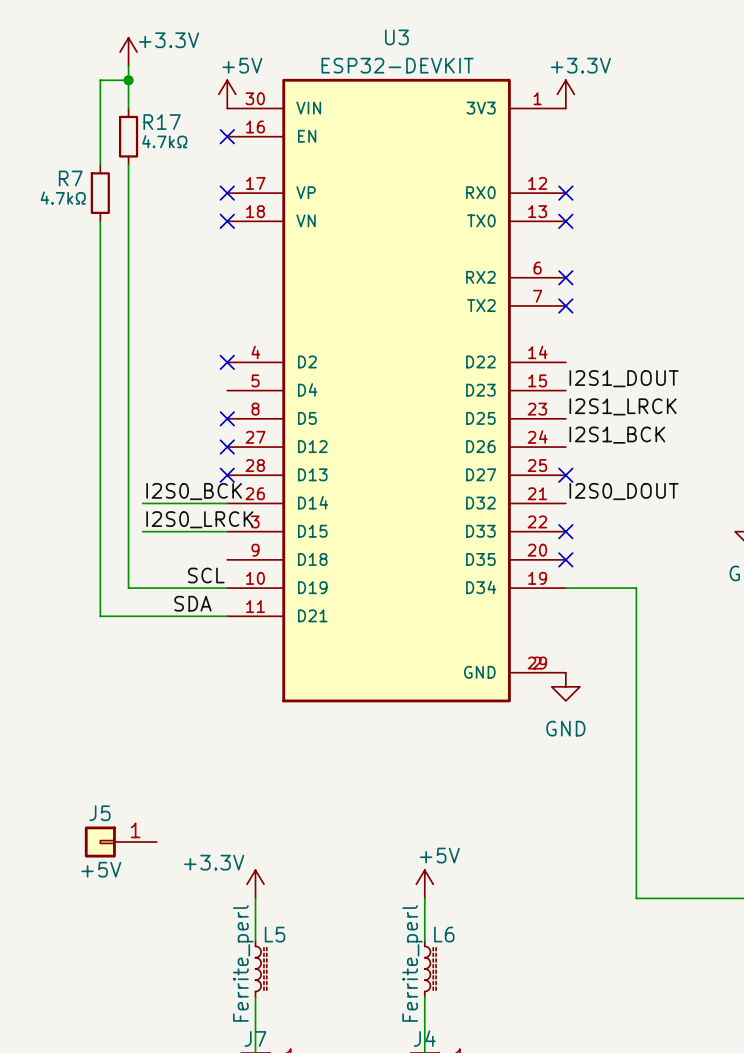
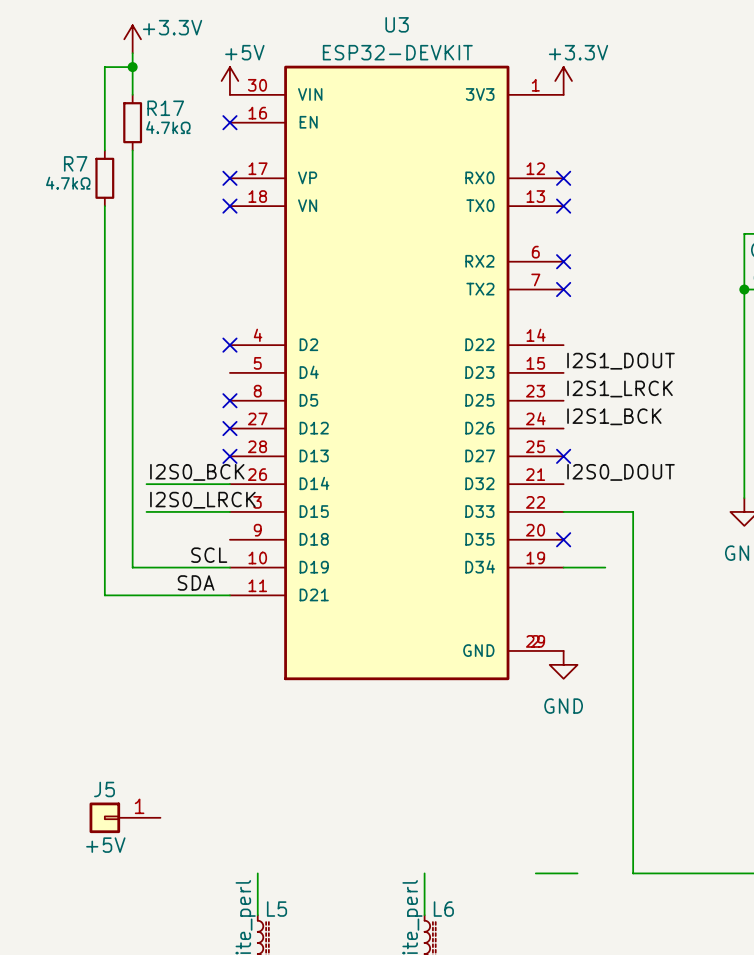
no-connect mark: (565, 531) -> none
wire: (608, 588) (636, 588) -> (563, 511) (633, 511) (633, 567)
power symbol: +3.3V (255, 884) -> none
power symbol: +5V (424, 884) -> none
wire: none -> (535, 873) (577, 873)

